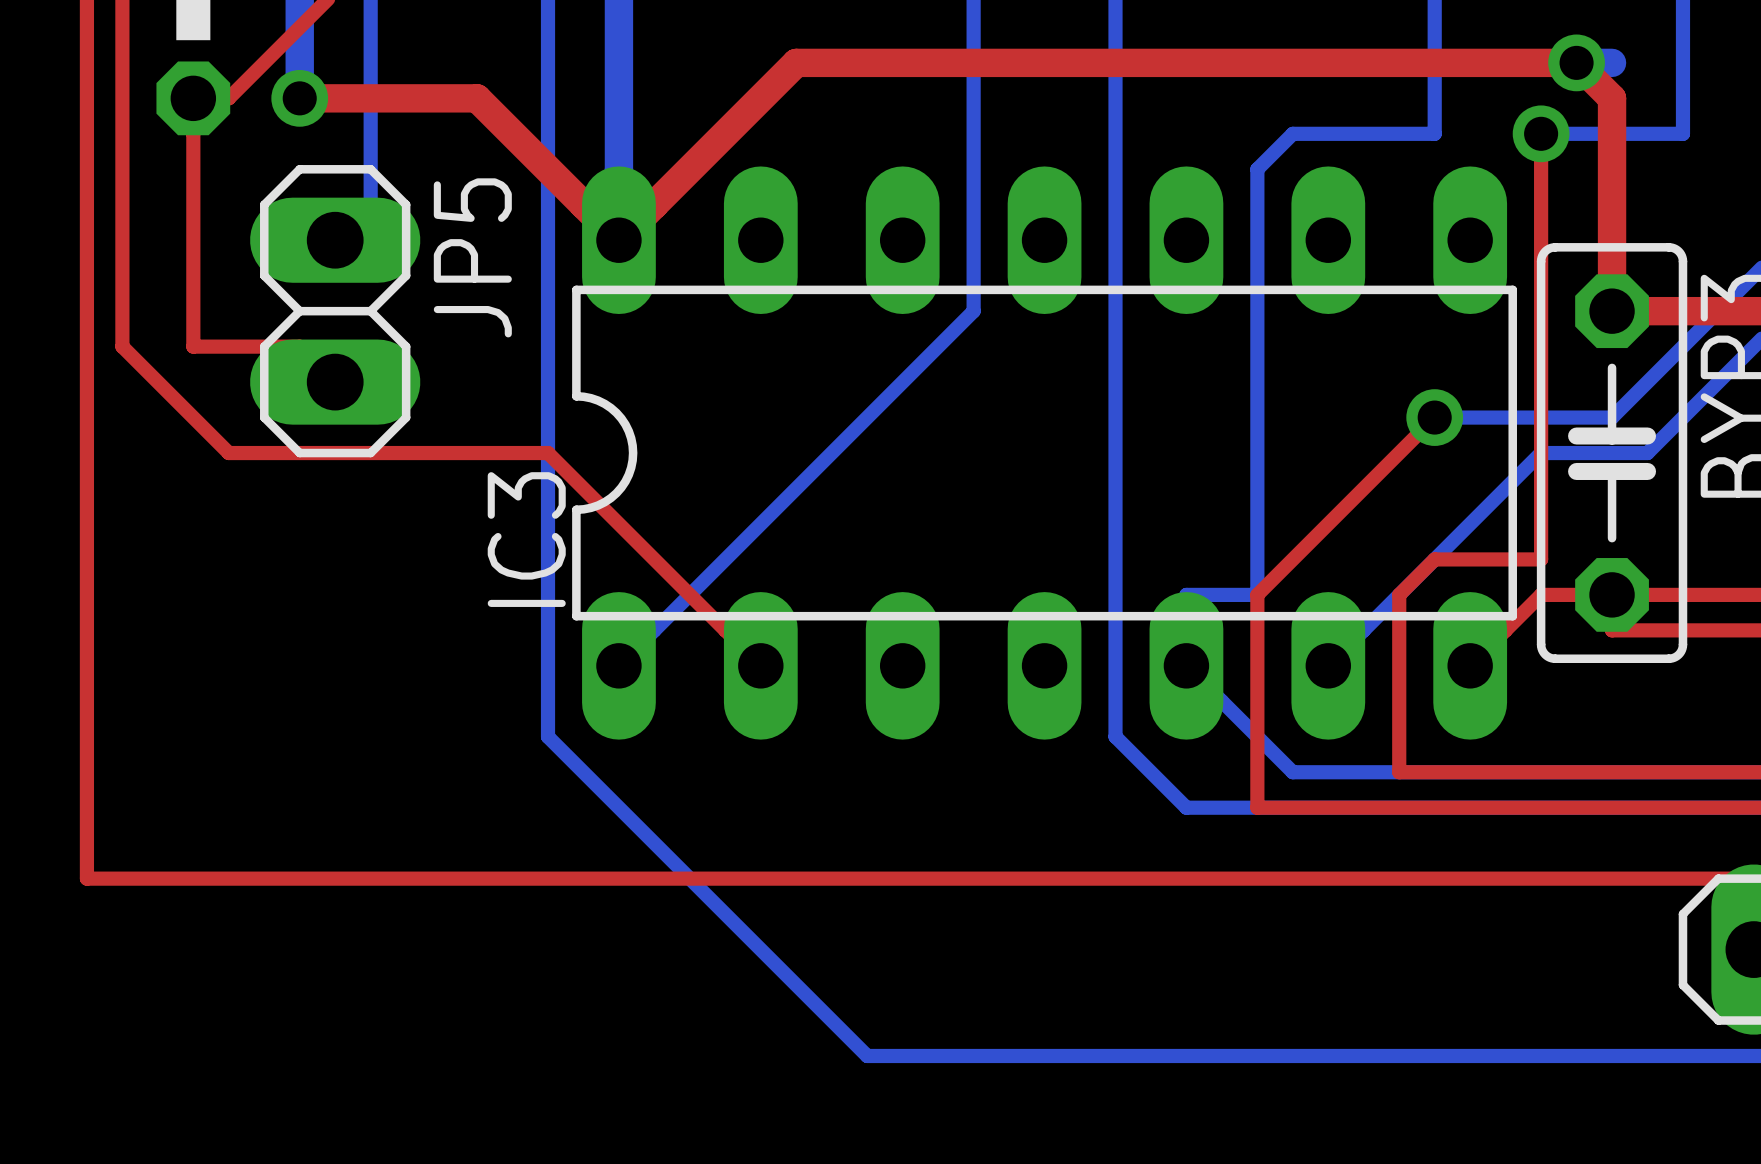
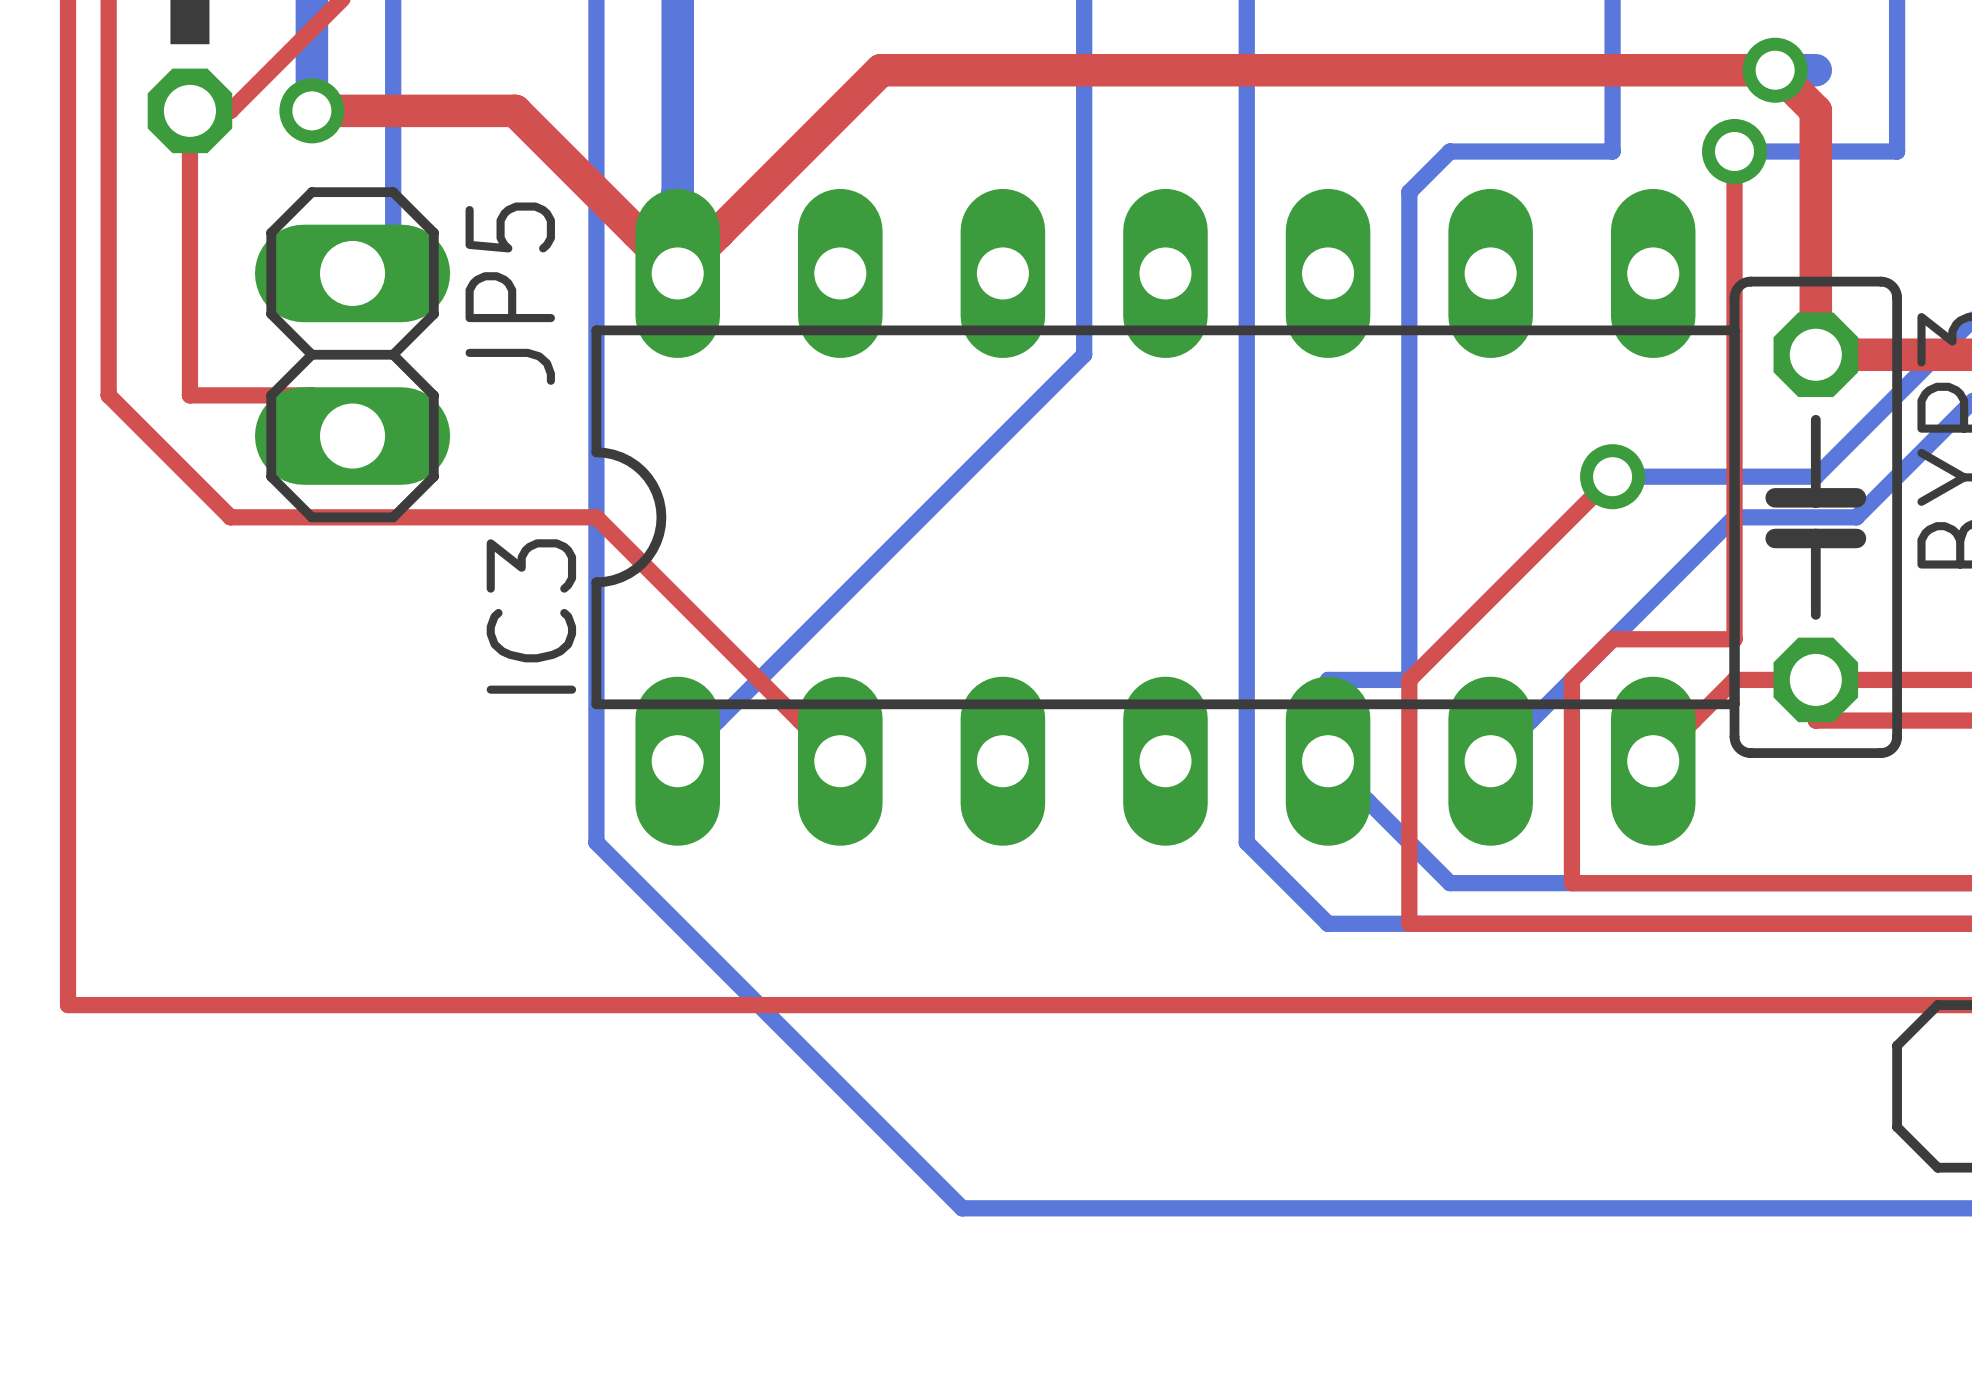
IC3 footprint: [572, 166, 1517, 740] -> [591, 188, 1740, 846]
IC3 name position: IC3 (526, 539) -> IC3 (531, 616)

